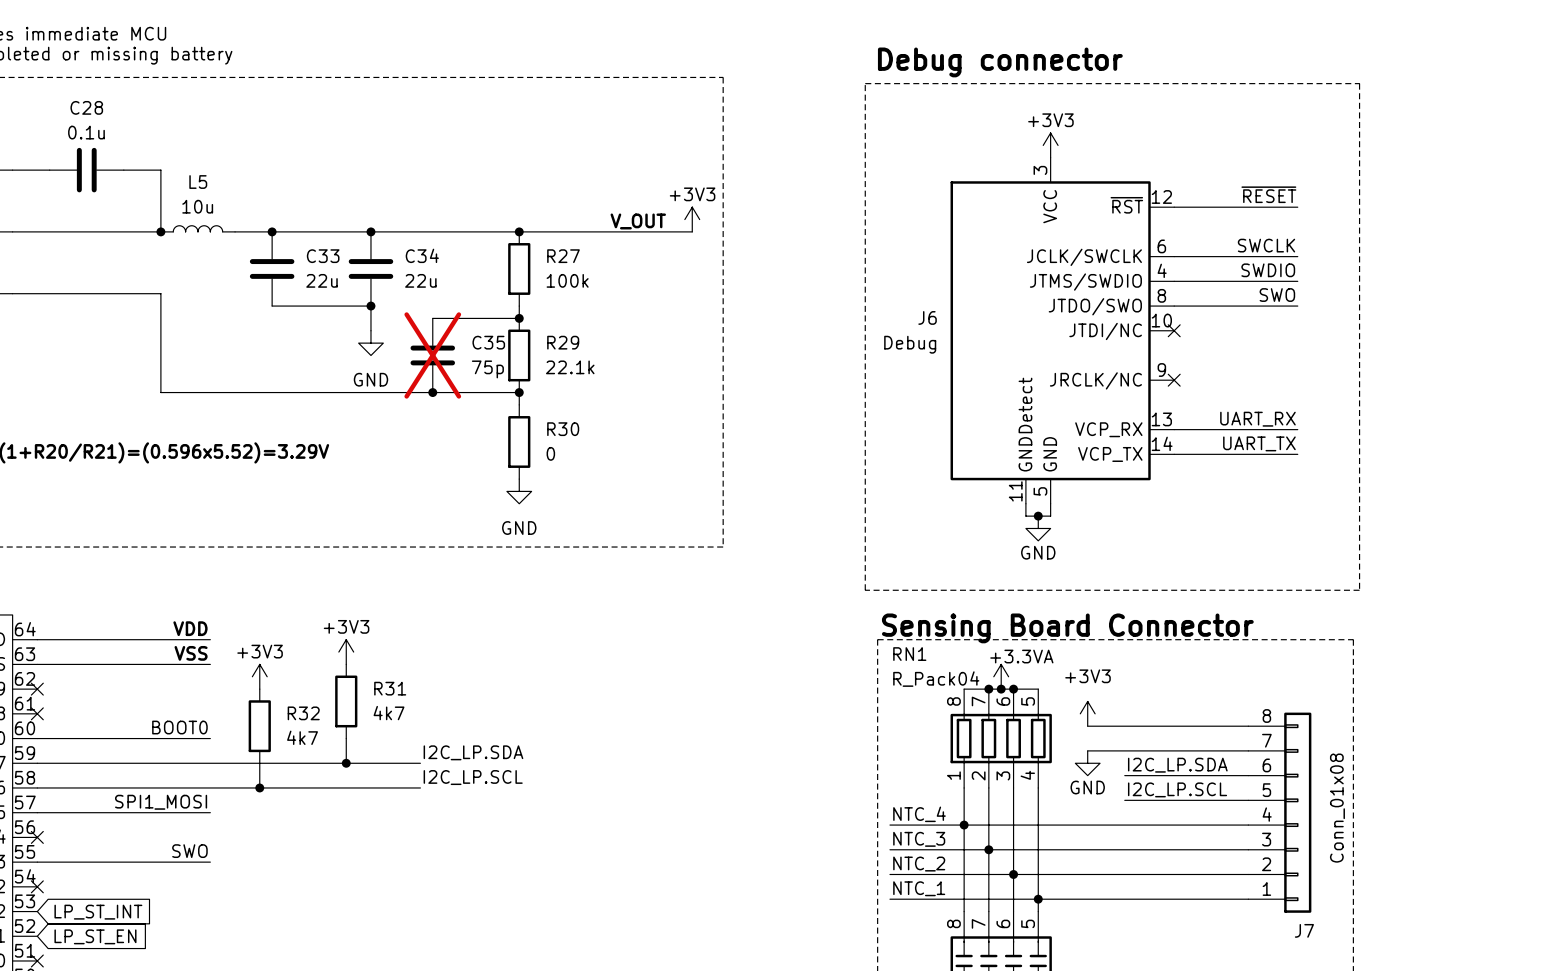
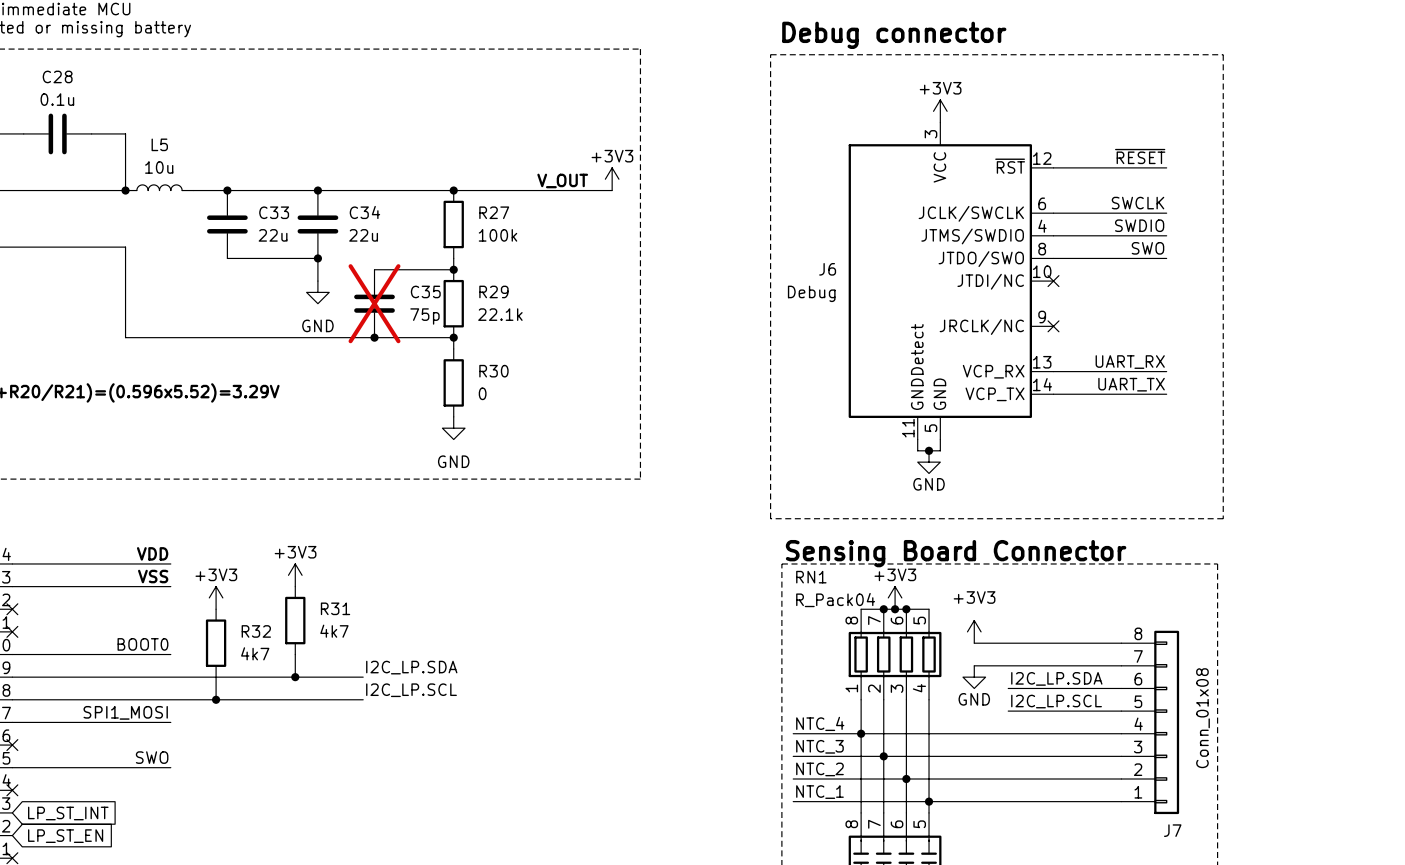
power symbol: +3.3VA (1001, 676) -> +3V3 (895, 597)

